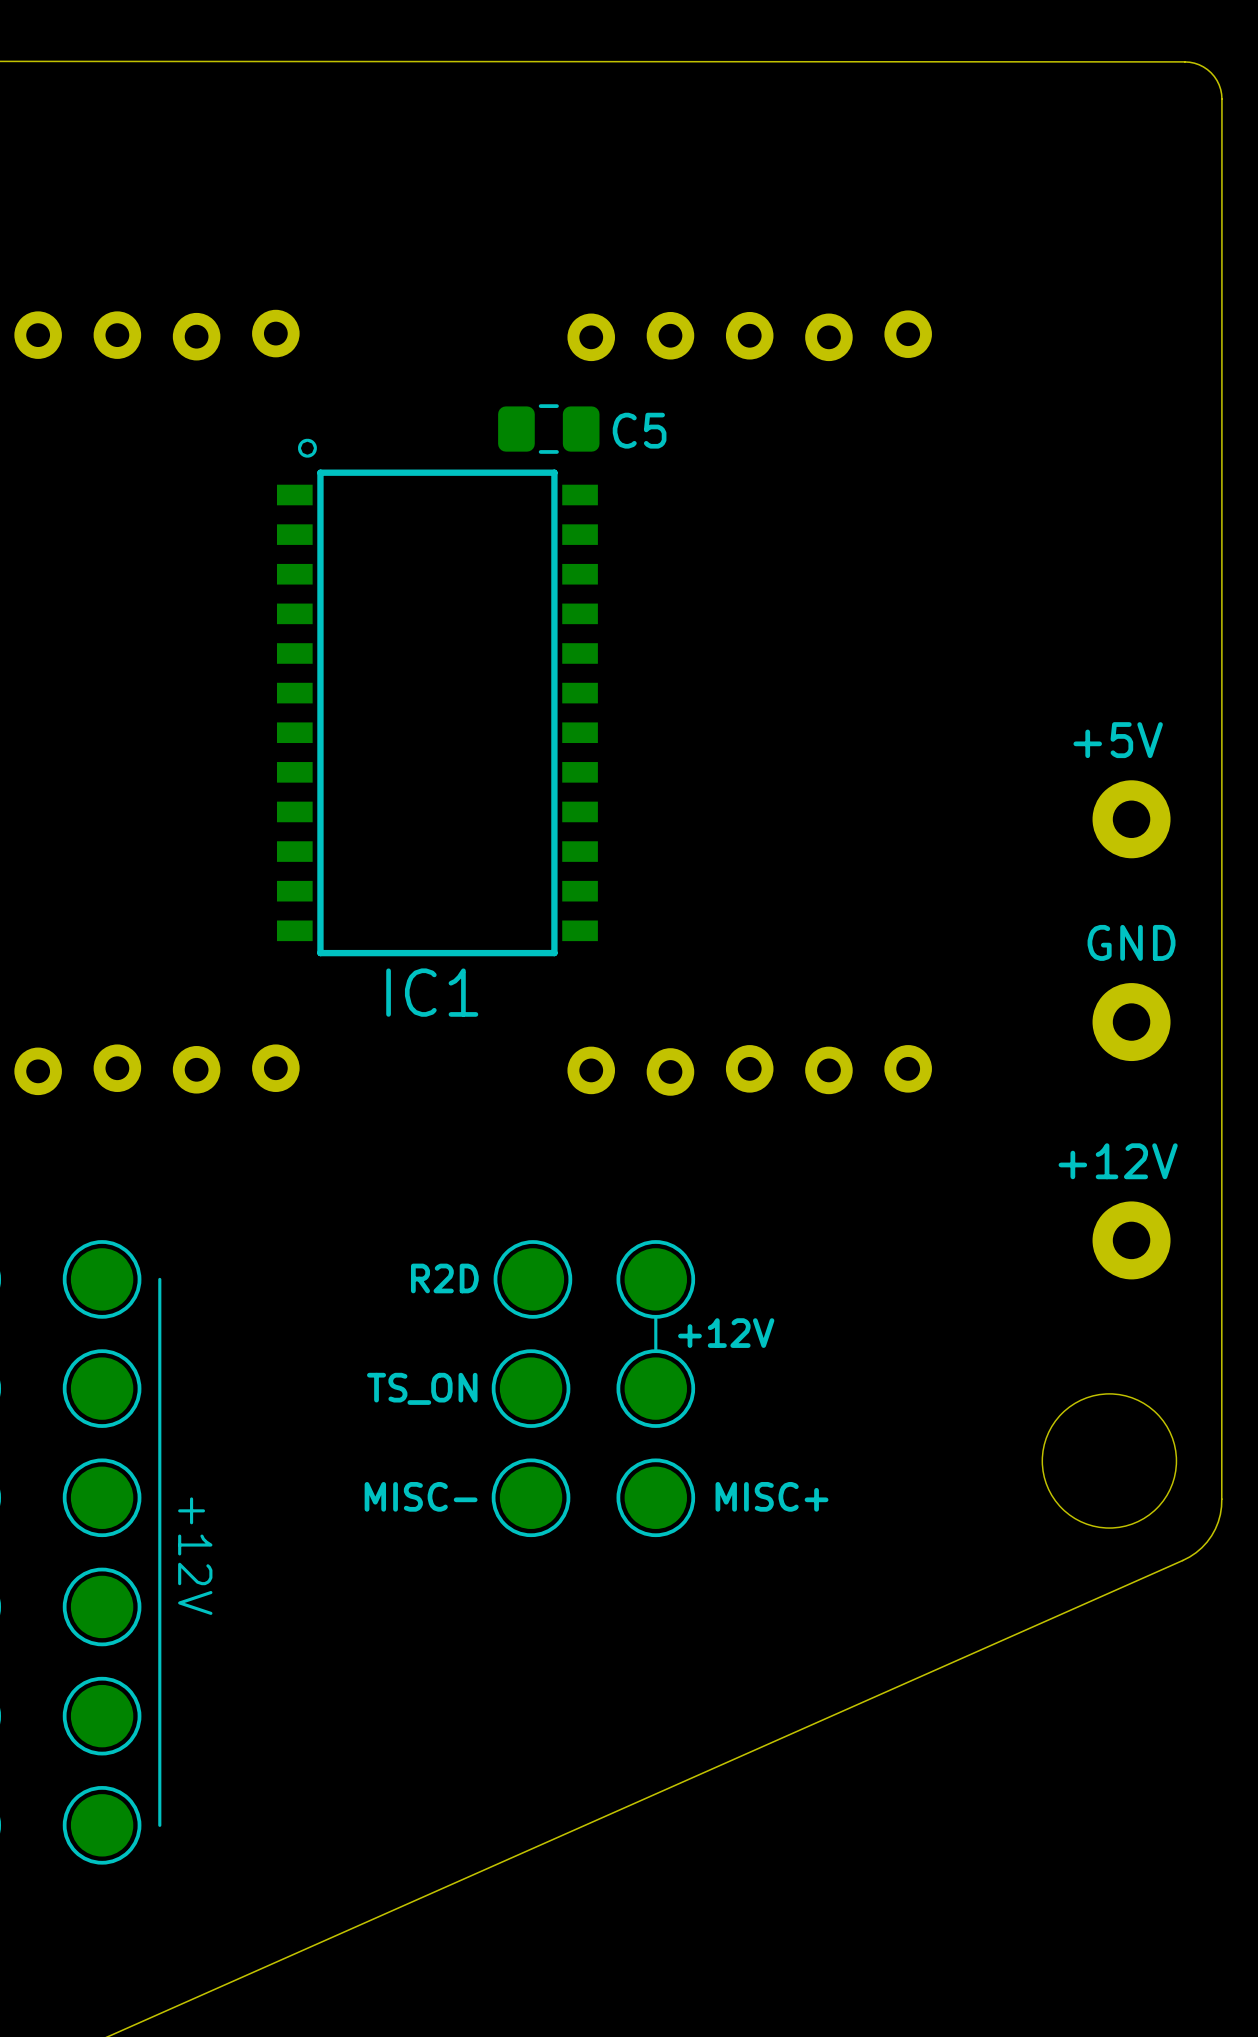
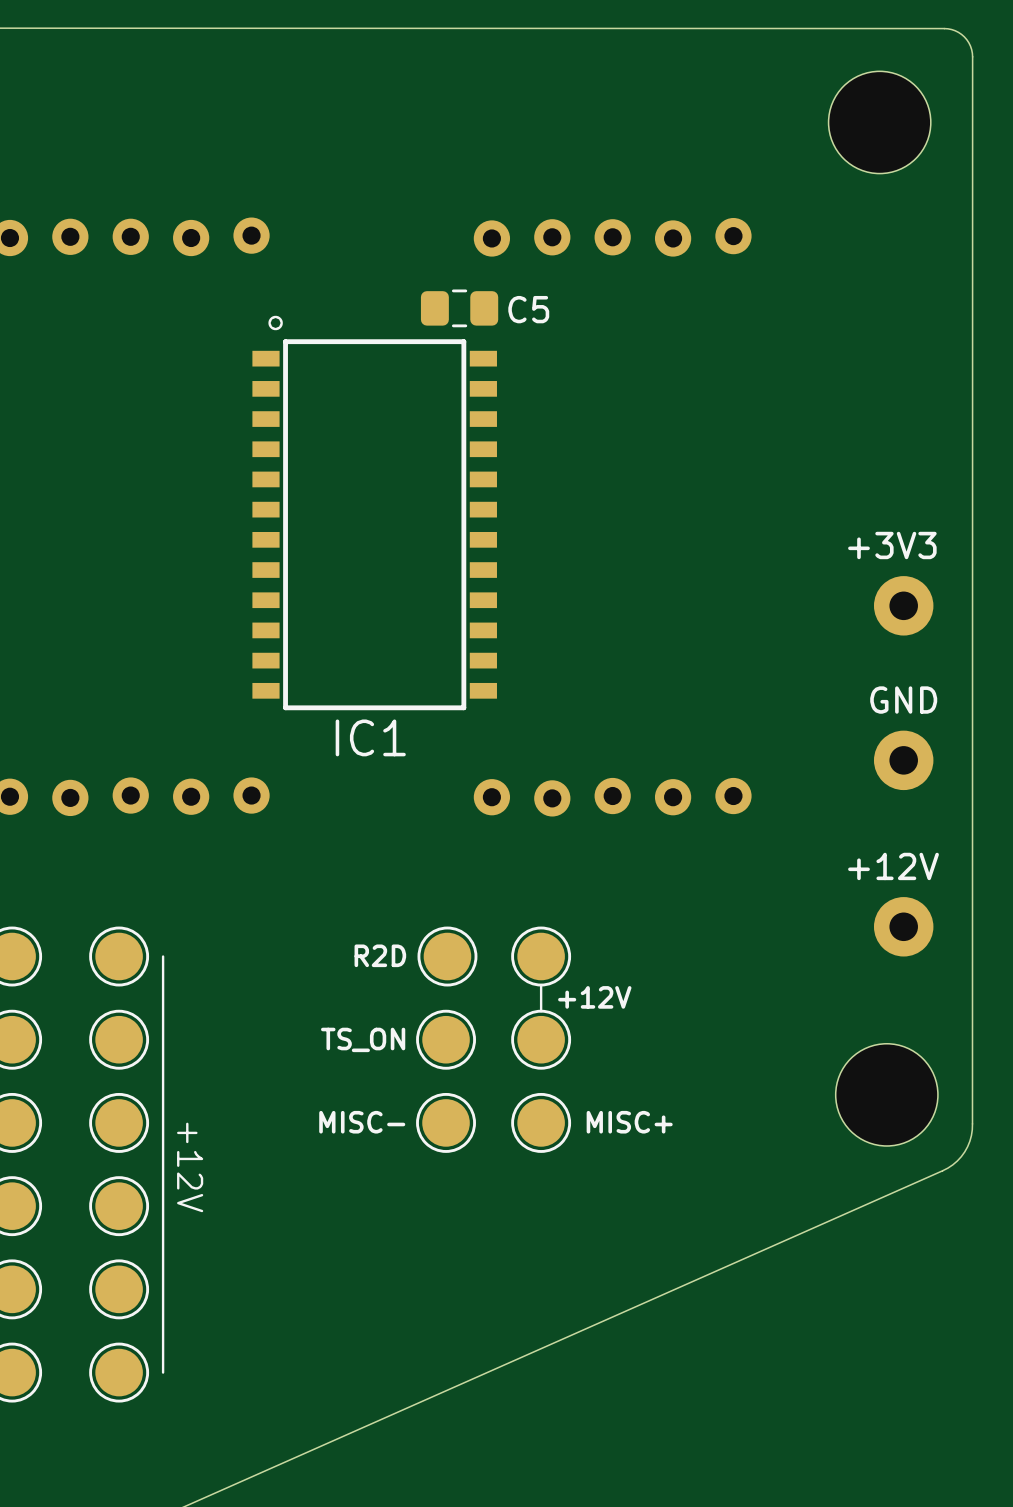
part: none -> (879, 122)
text: +5V (1118, 740) -> +3V3 (892, 545)

